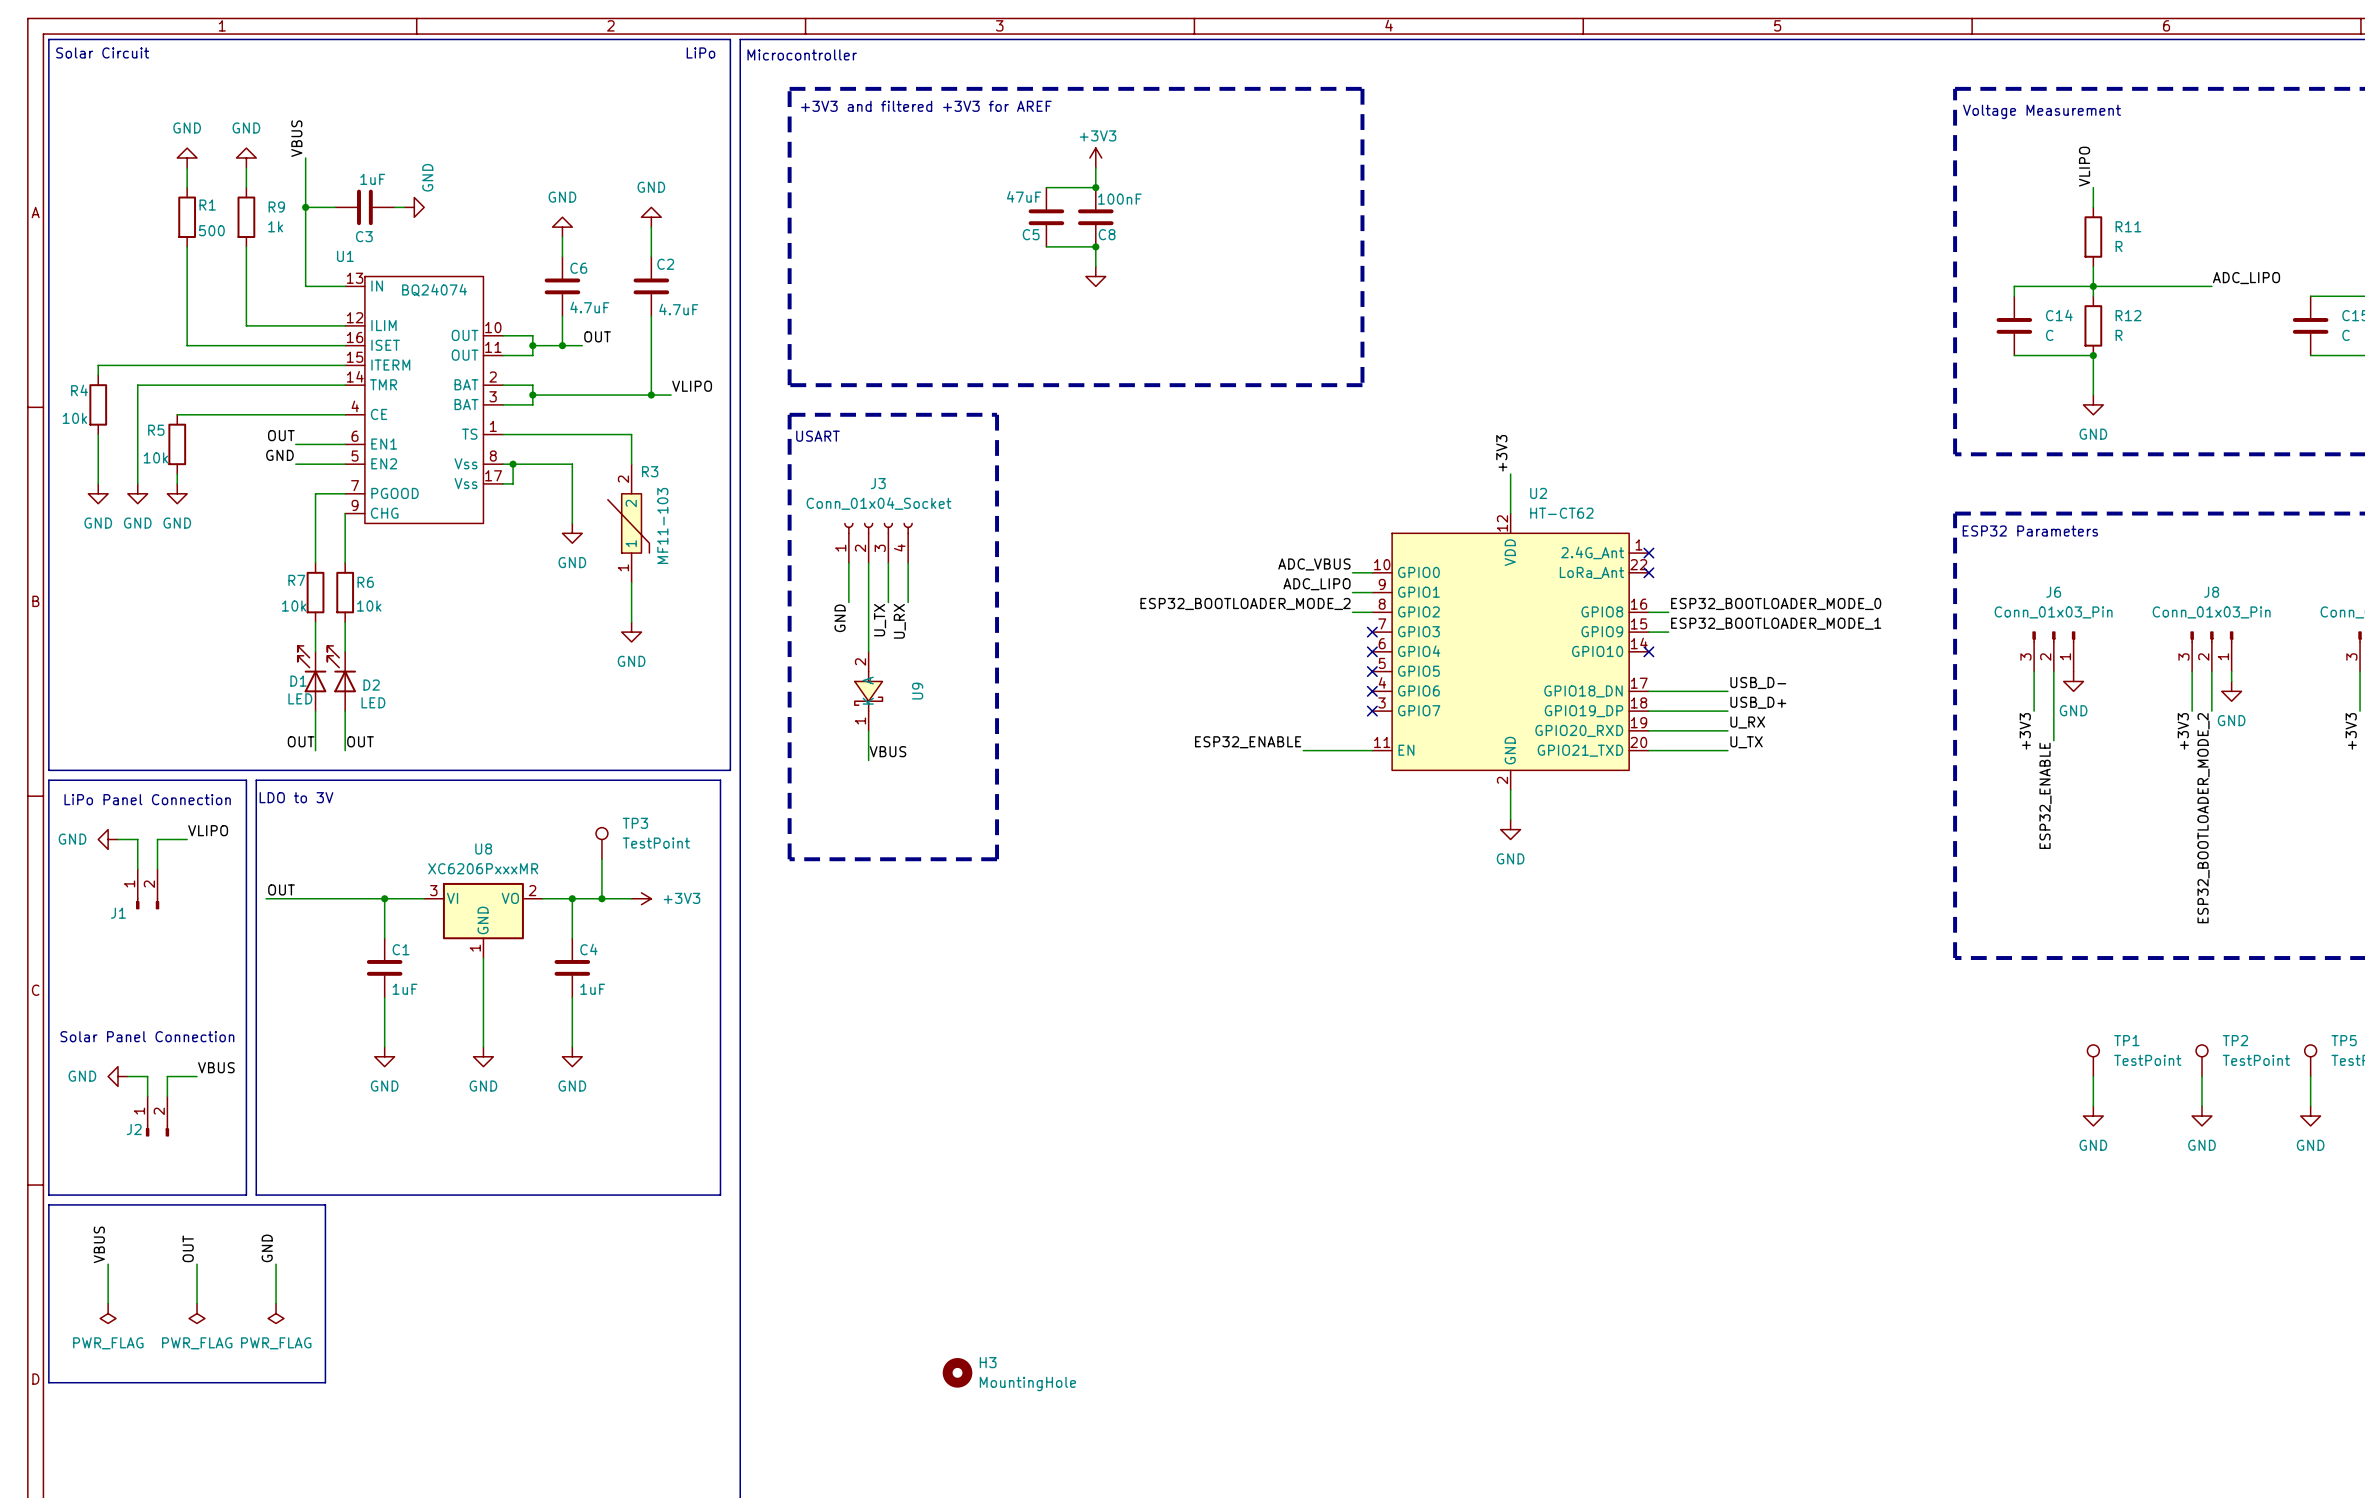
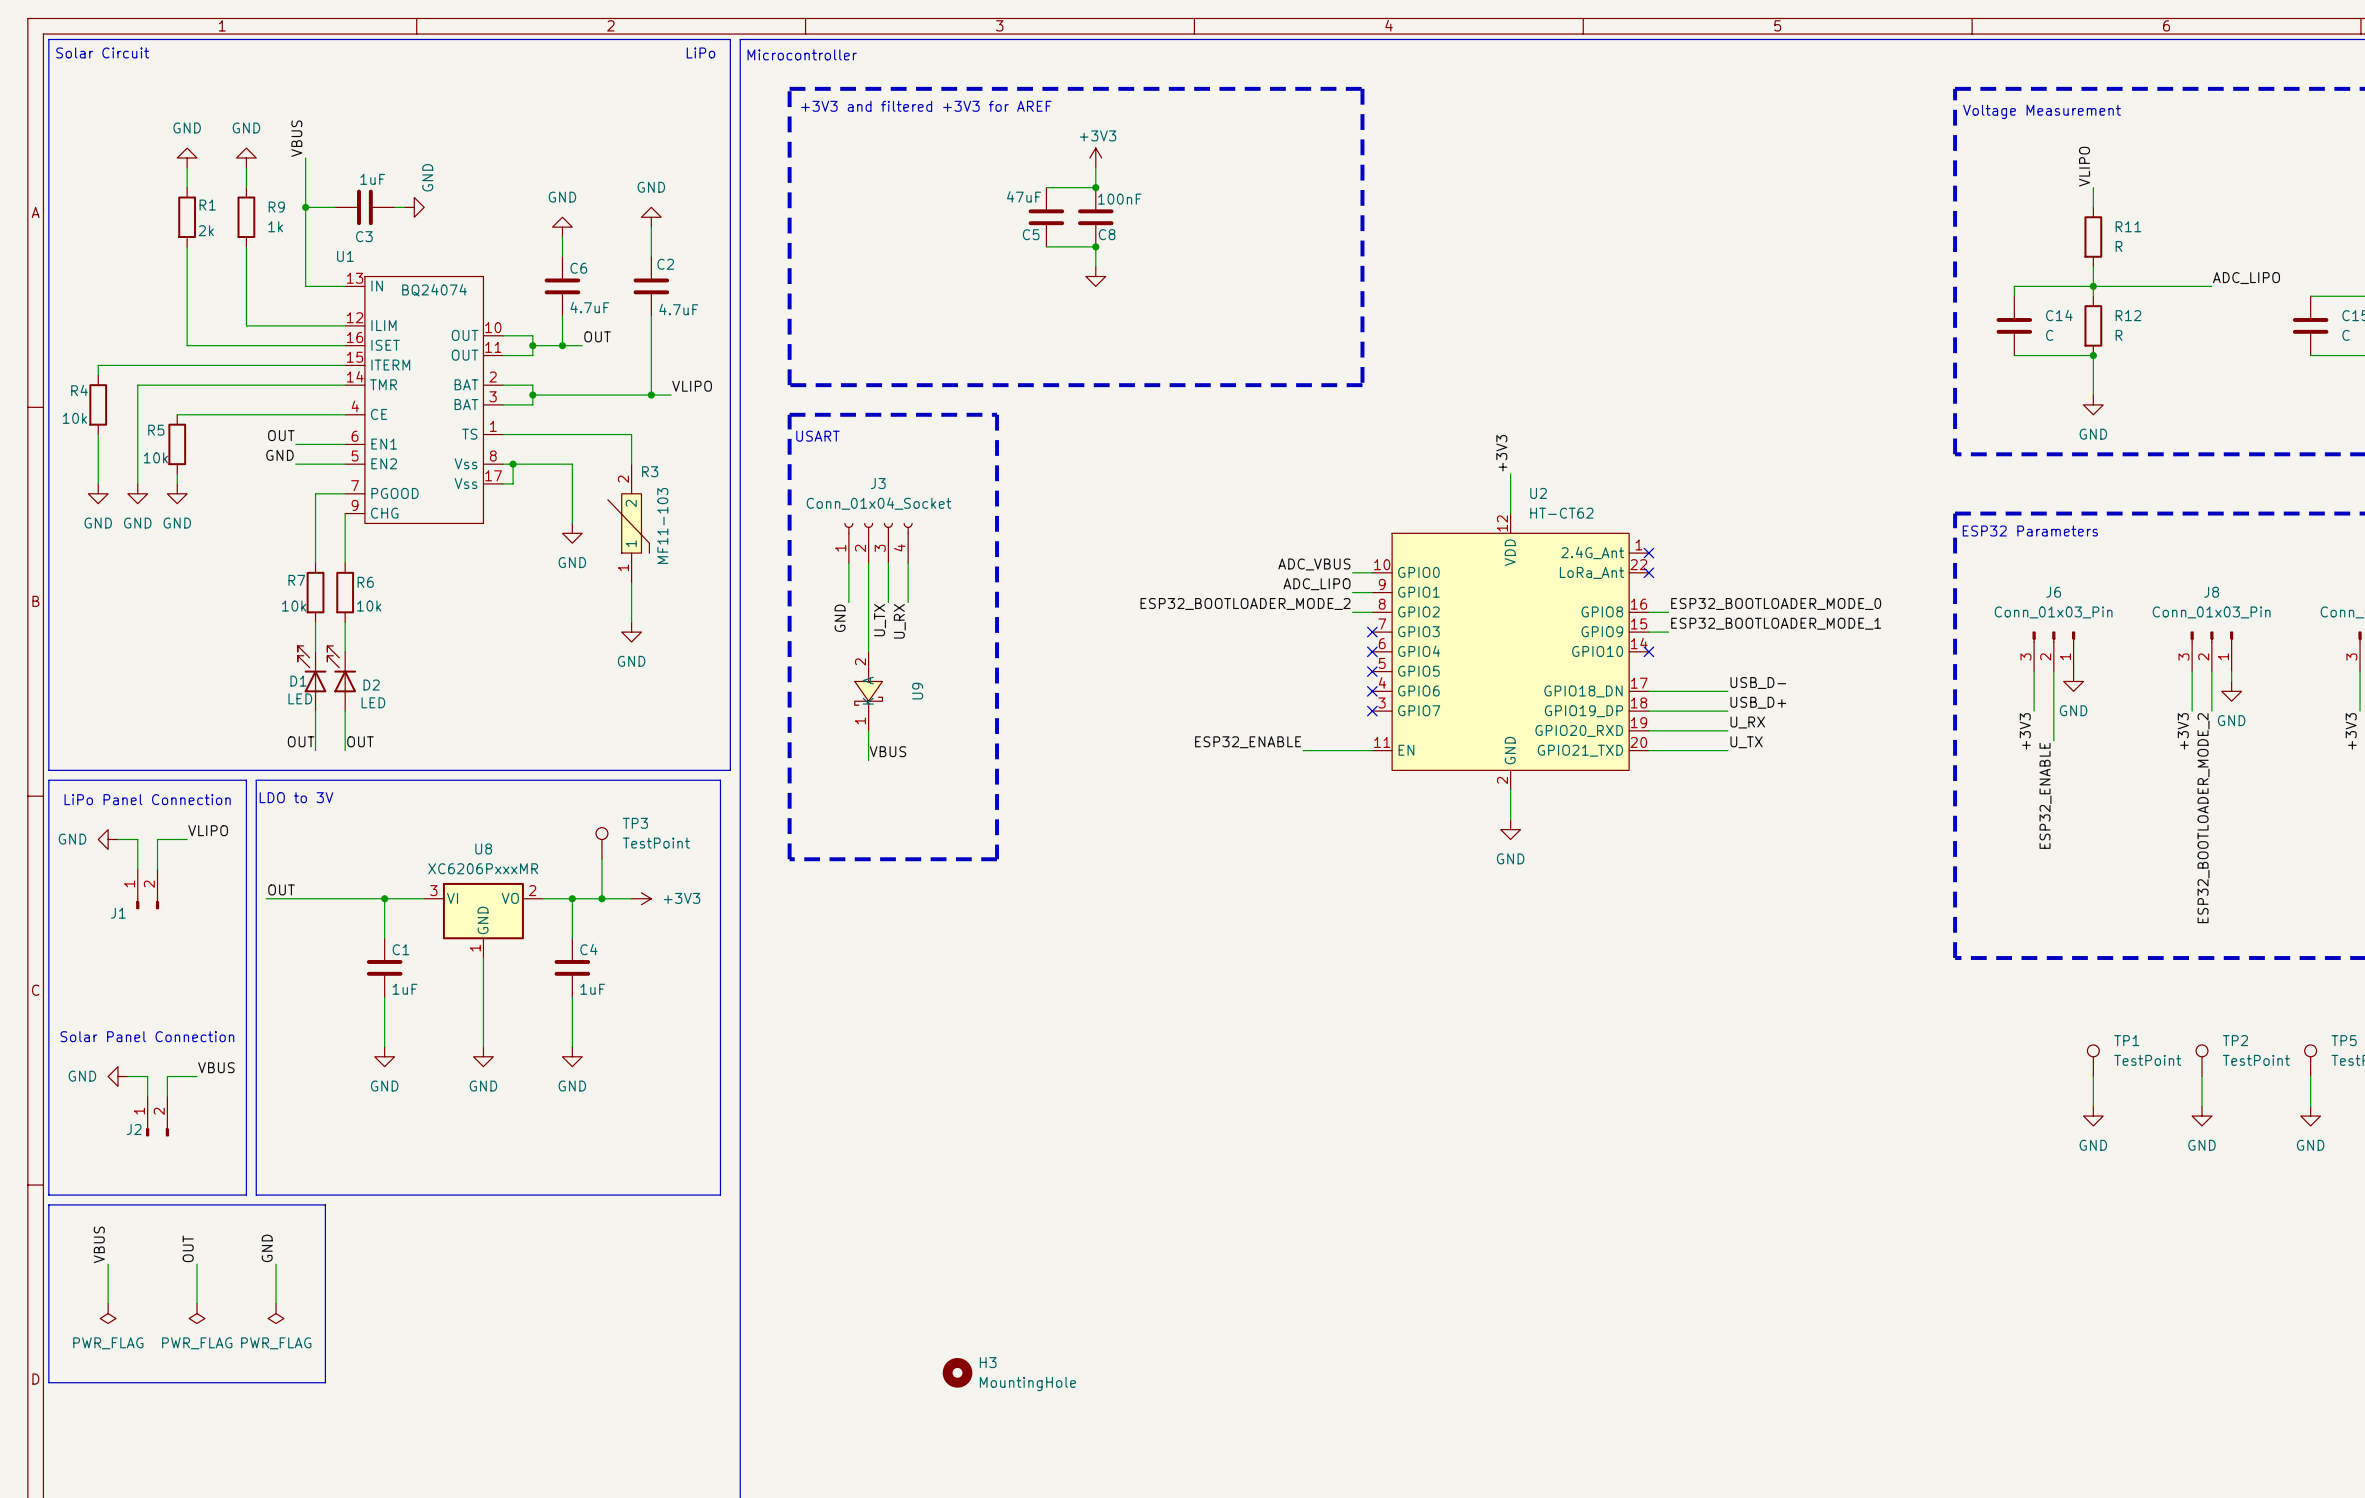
R1 value: 500 (211, 230) -> 2k (206, 230)

